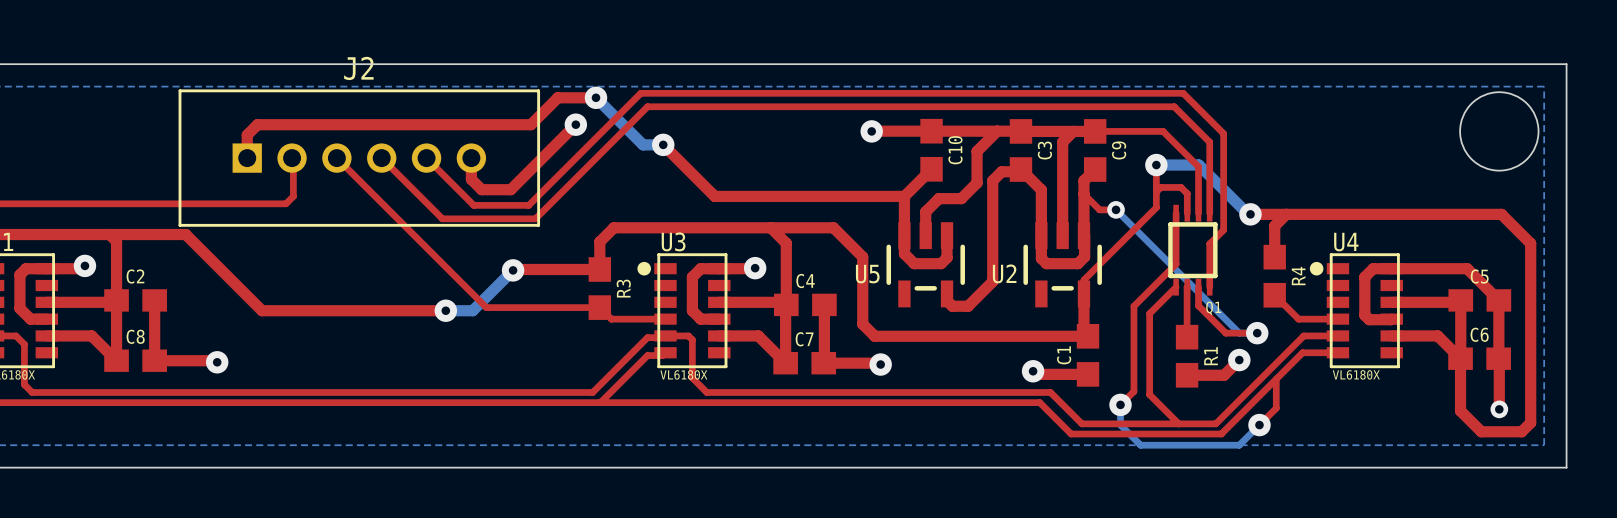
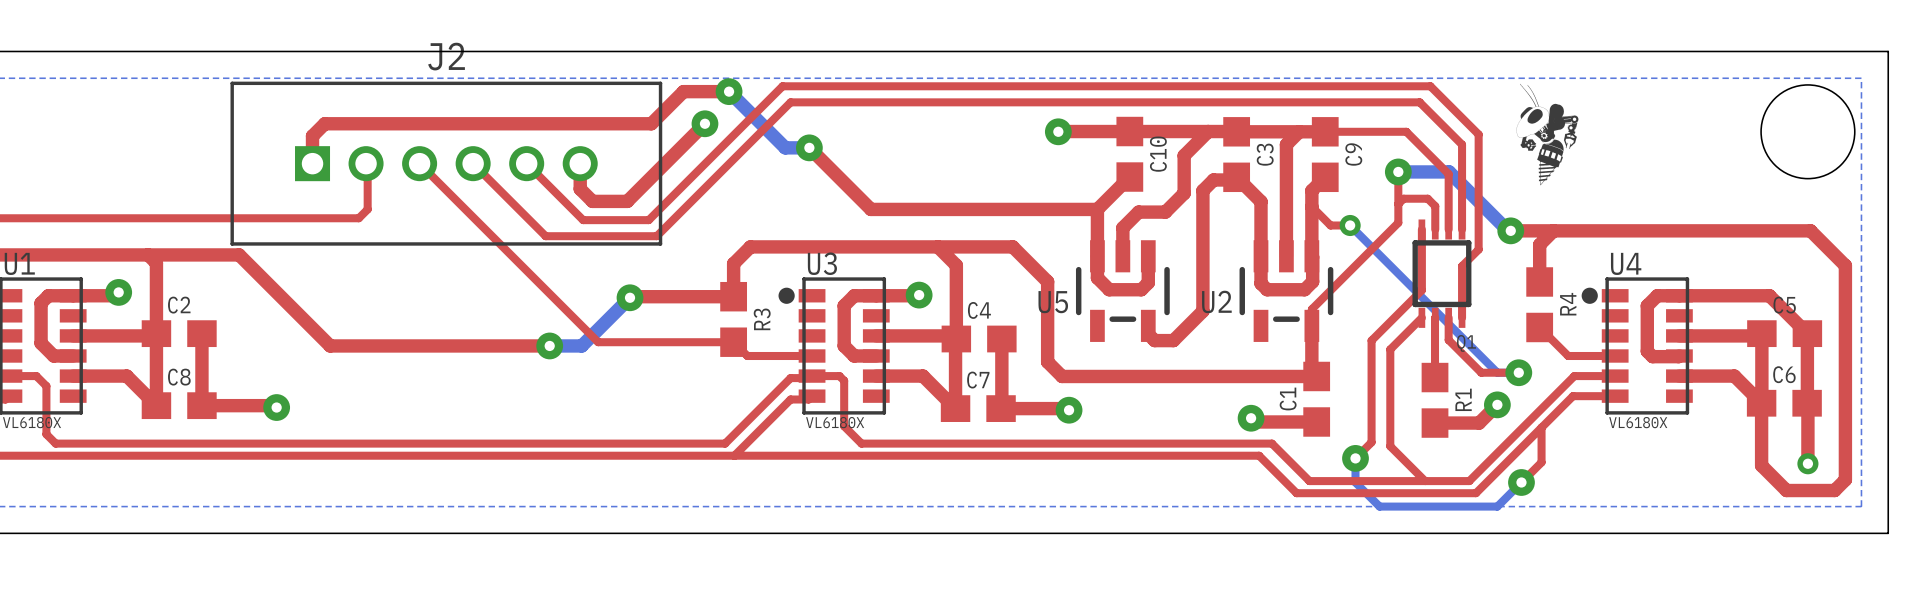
drawing: none -> [1516, 83, 1579, 186]

